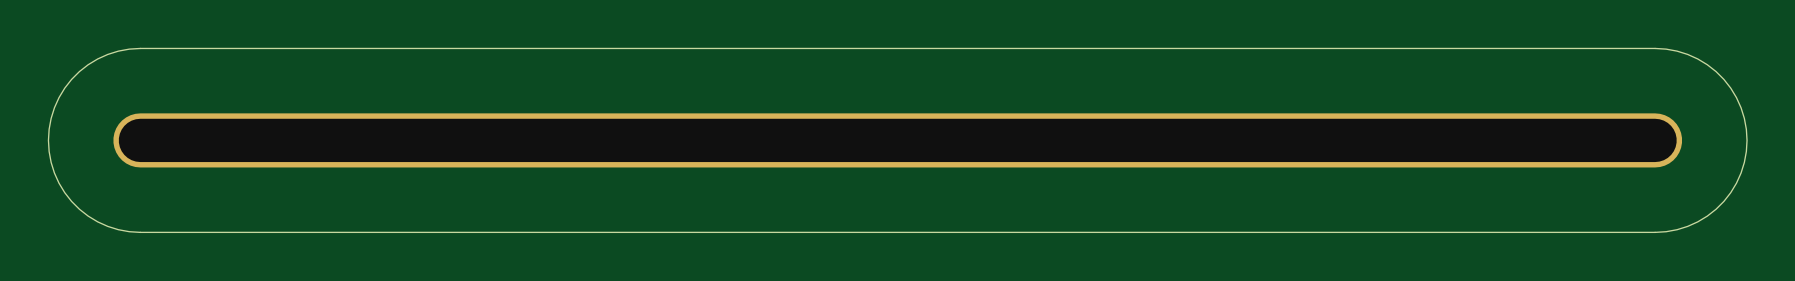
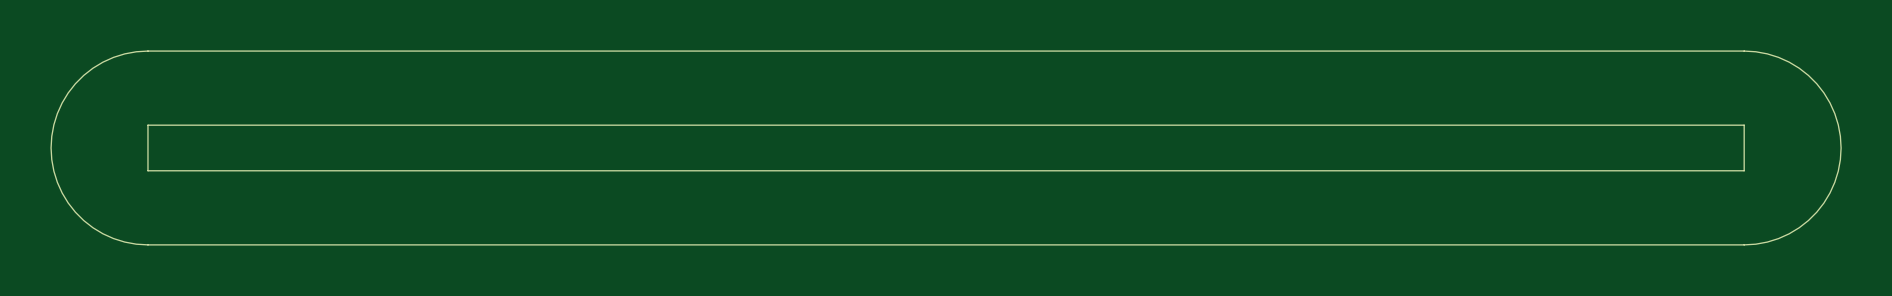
board edge: none -> (1744, 125) (1744, 170) (147, 170) (147, 125) (1744, 125)
part: (897, 140) -> none

